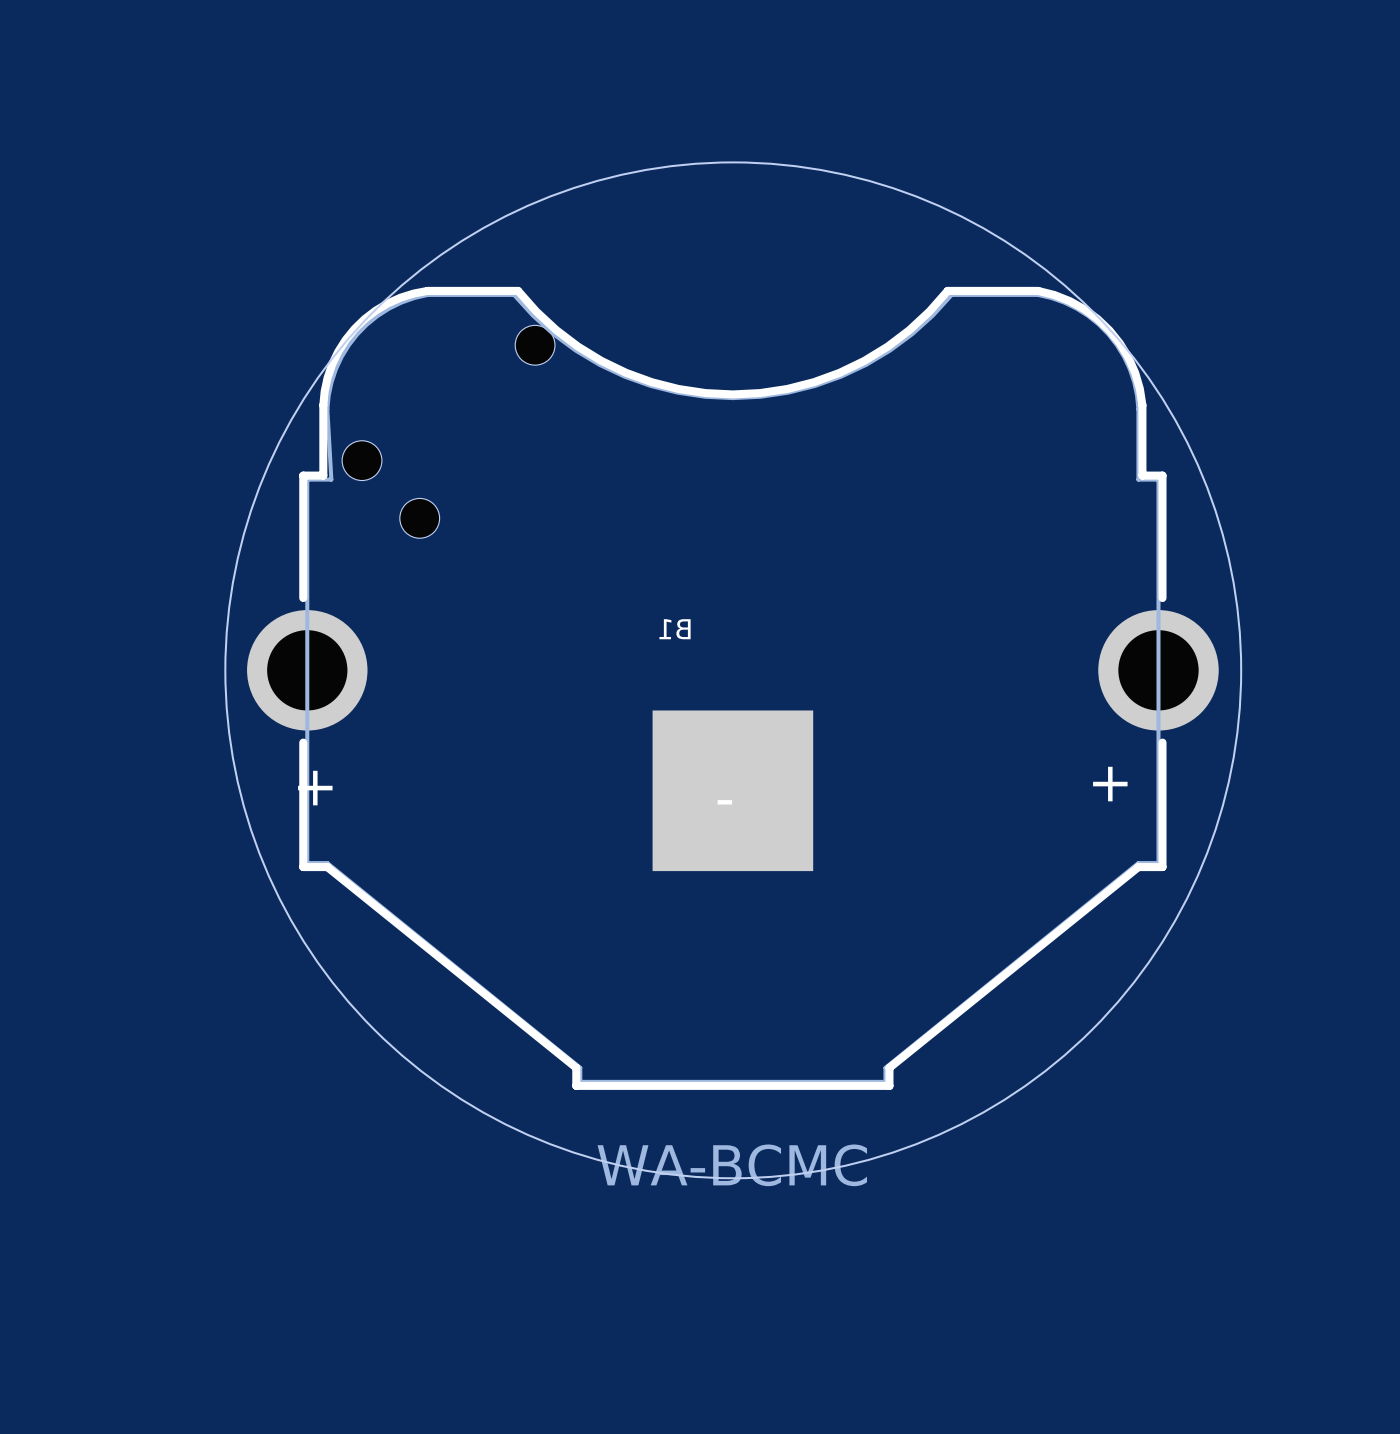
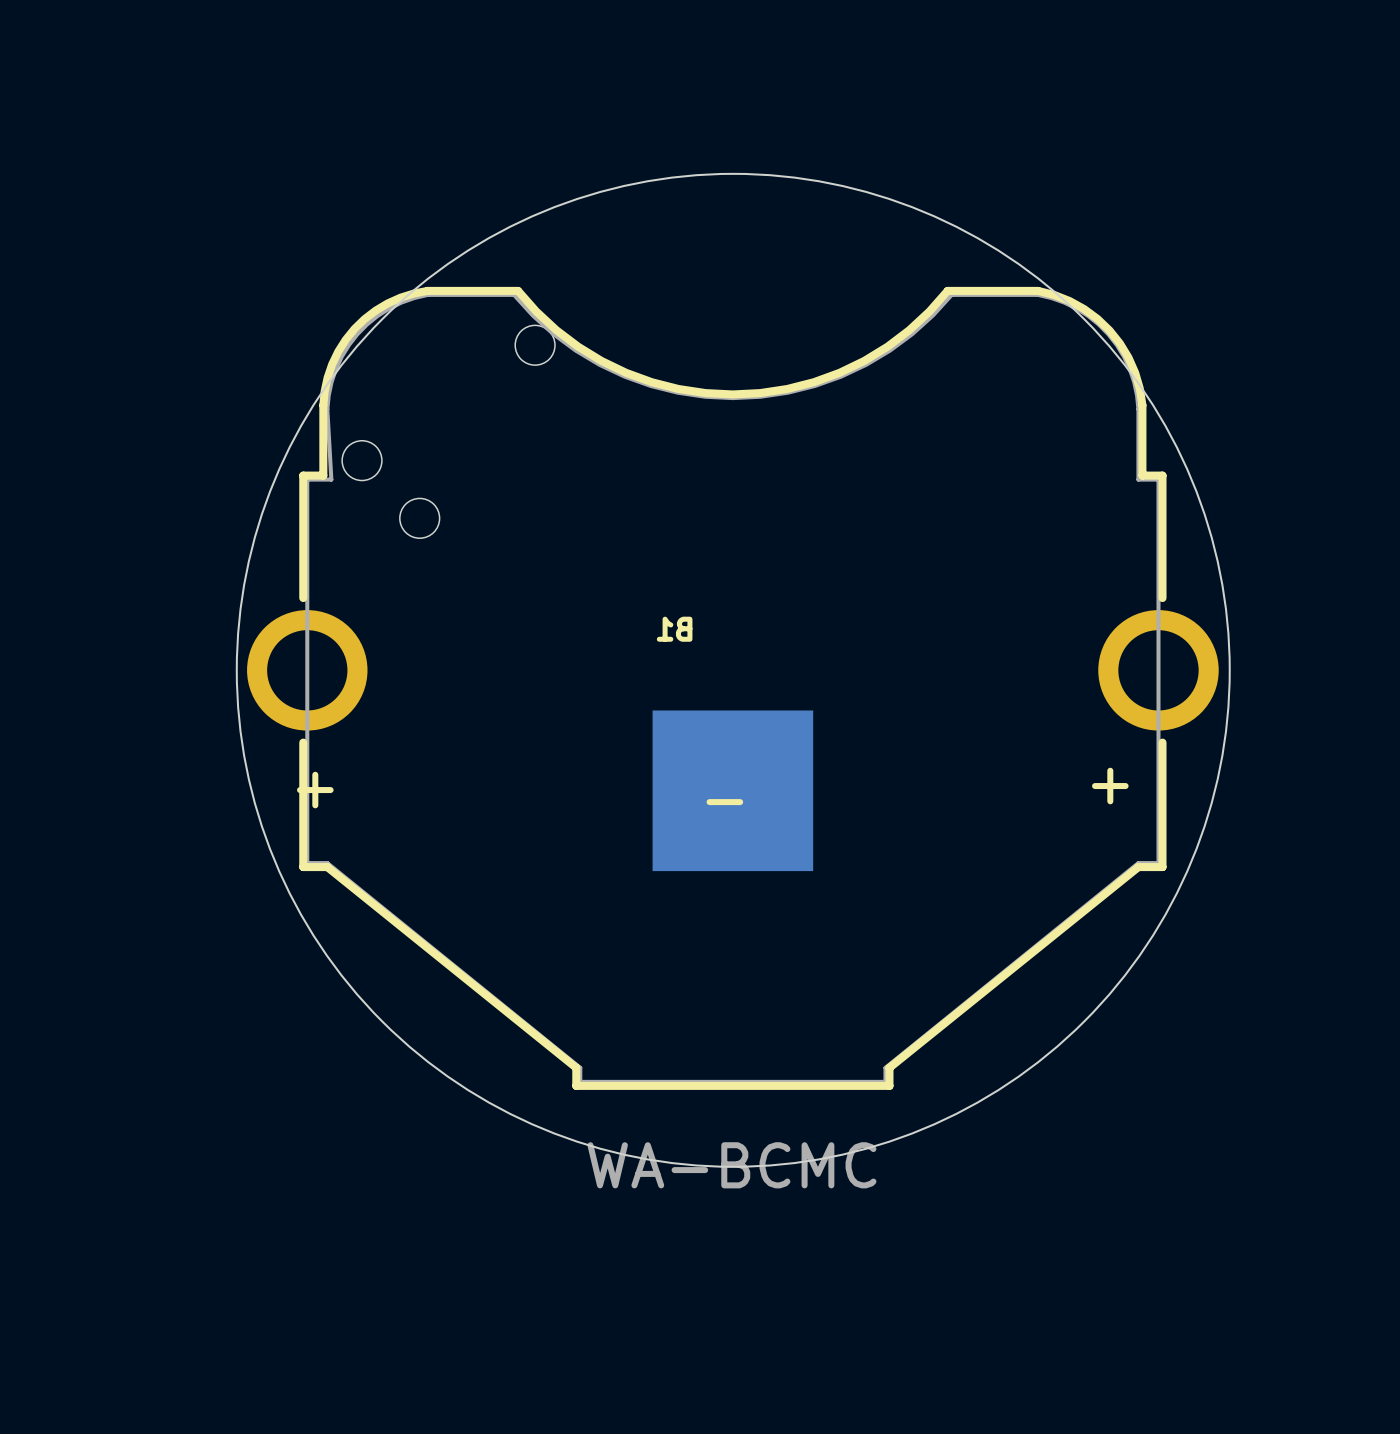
round board edge size: [224, 161, 1243, 1180] -> [235, 172, 1231, 1168]

